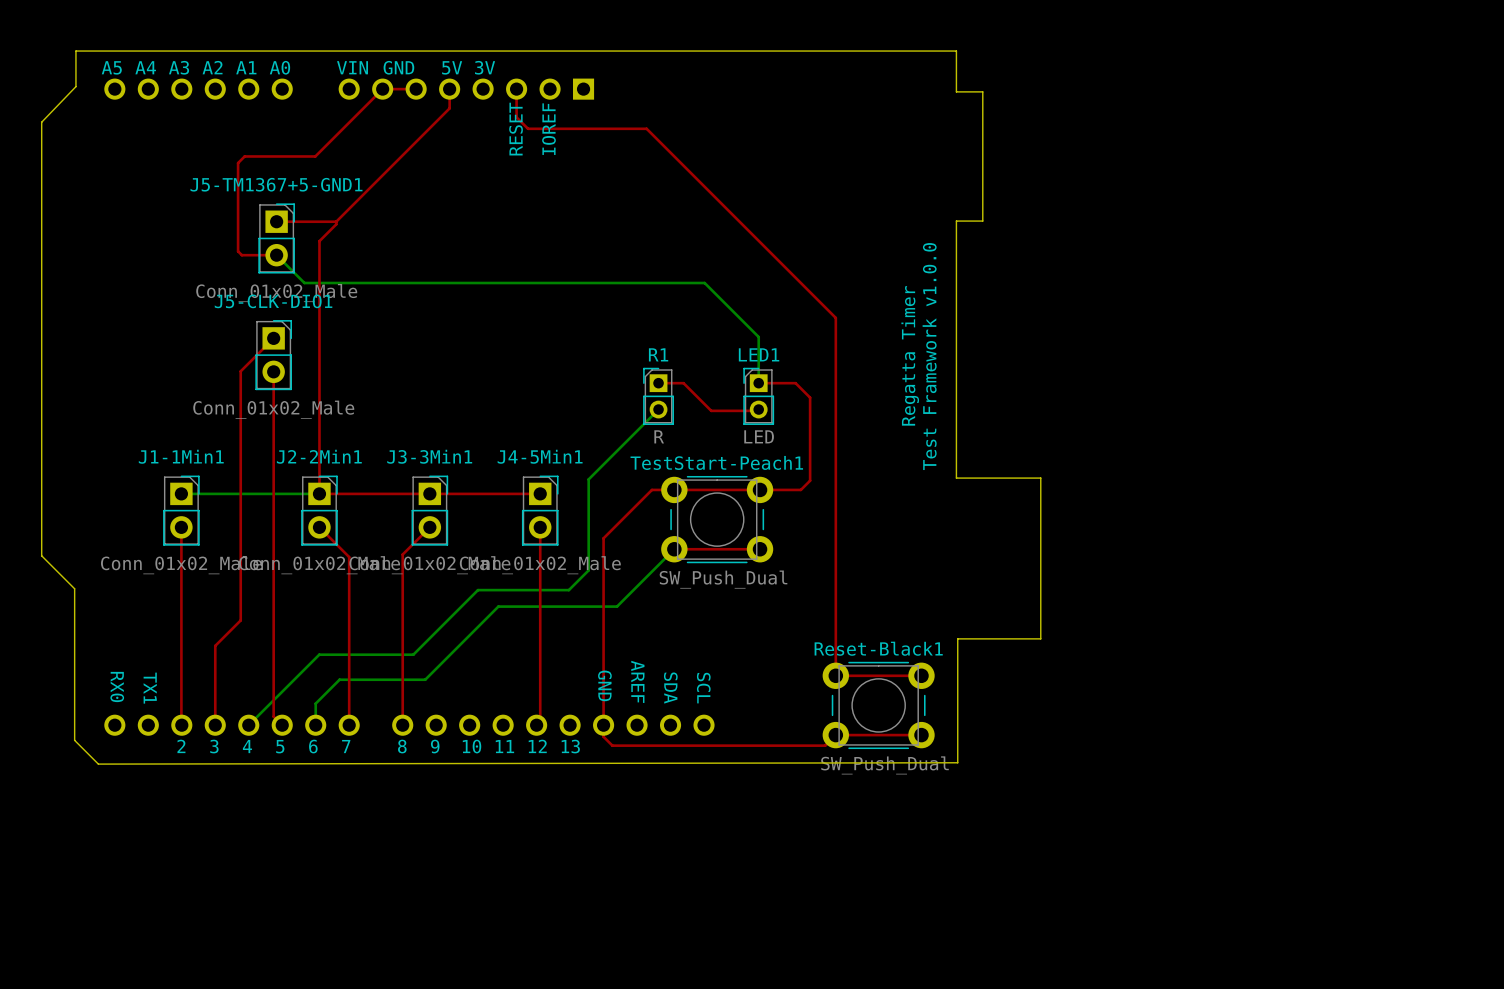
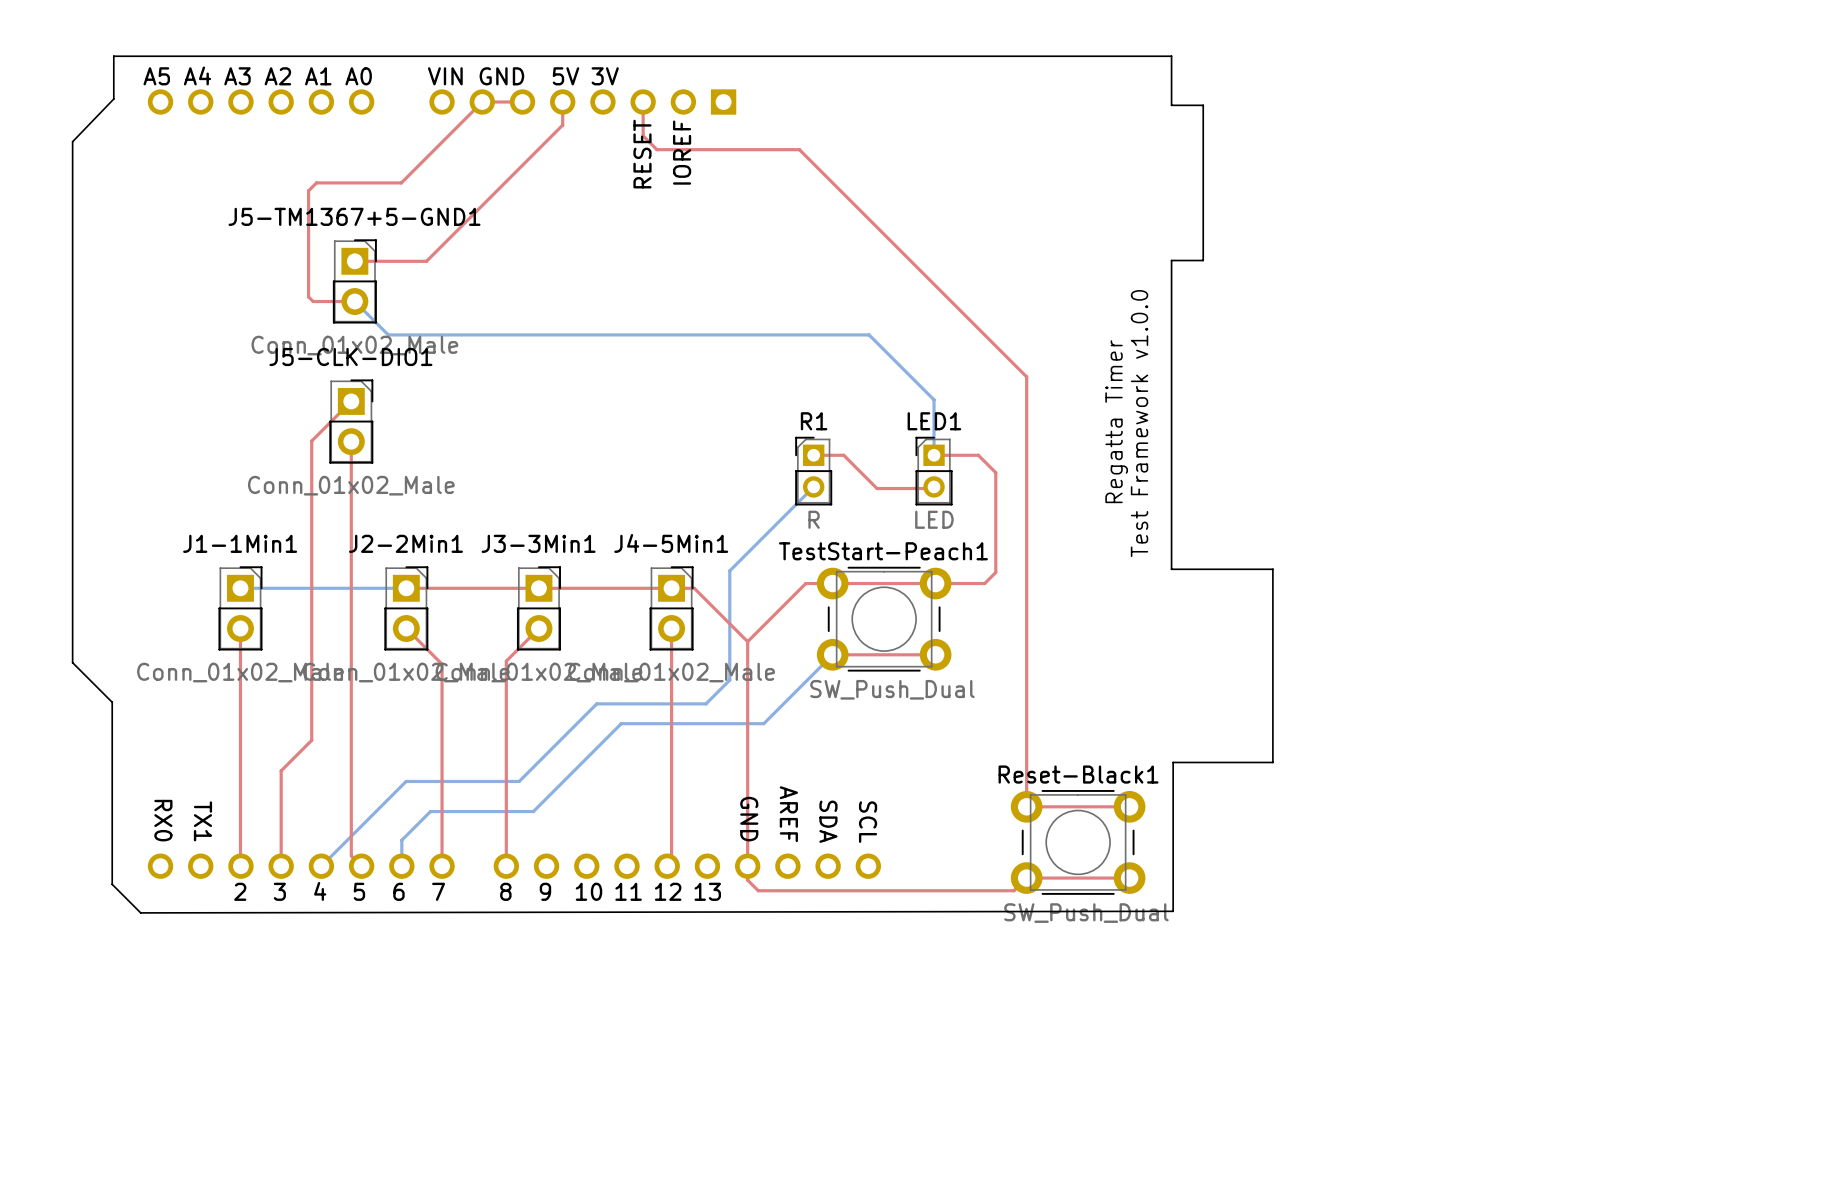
top track: (336, 221) (336, 224) (319, 241) (319, 493) -> none
top track: none -> (677, 588) (694, 588) (747, 641)

